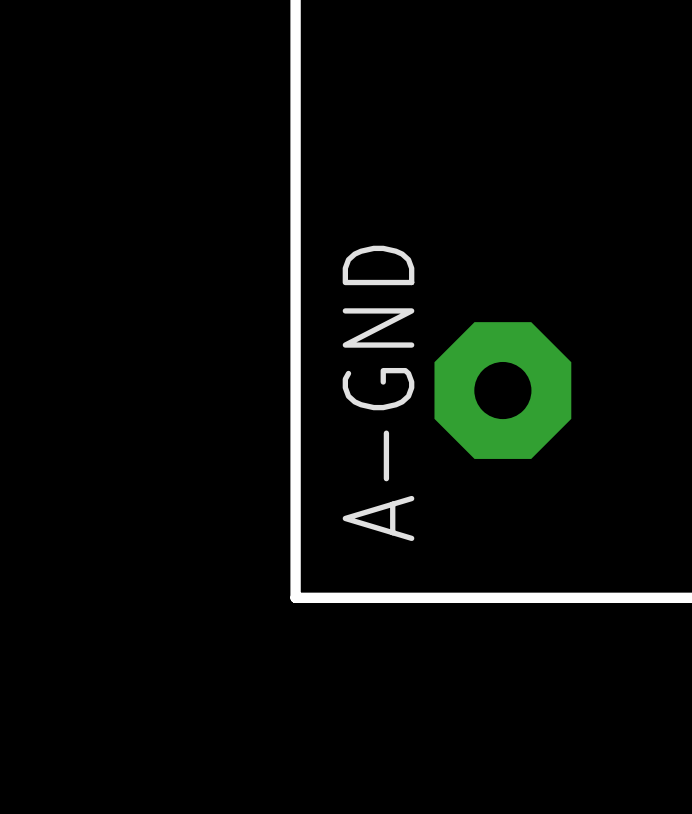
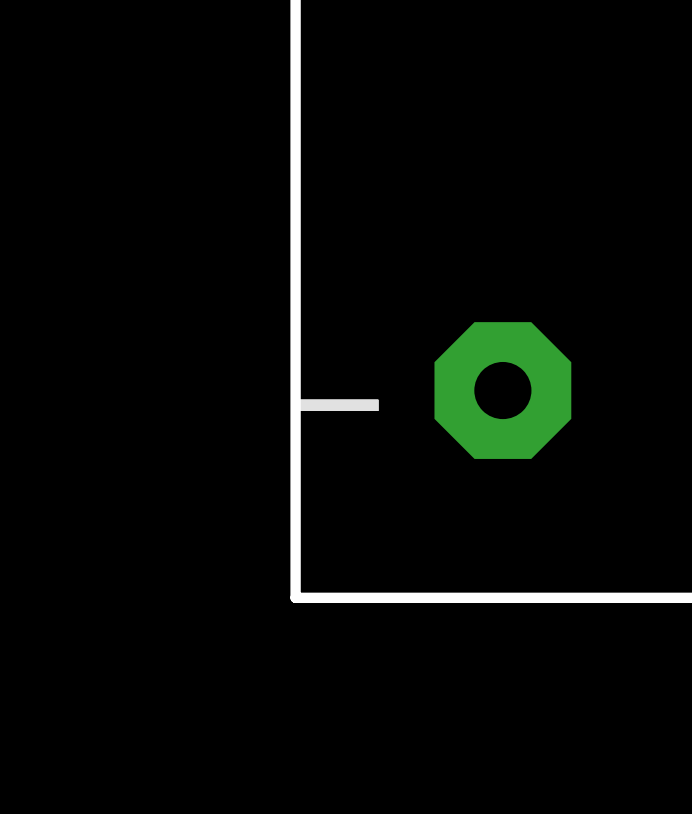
A-GND name: A-GND (378, 393) -> ̶̶ (337, 405)

